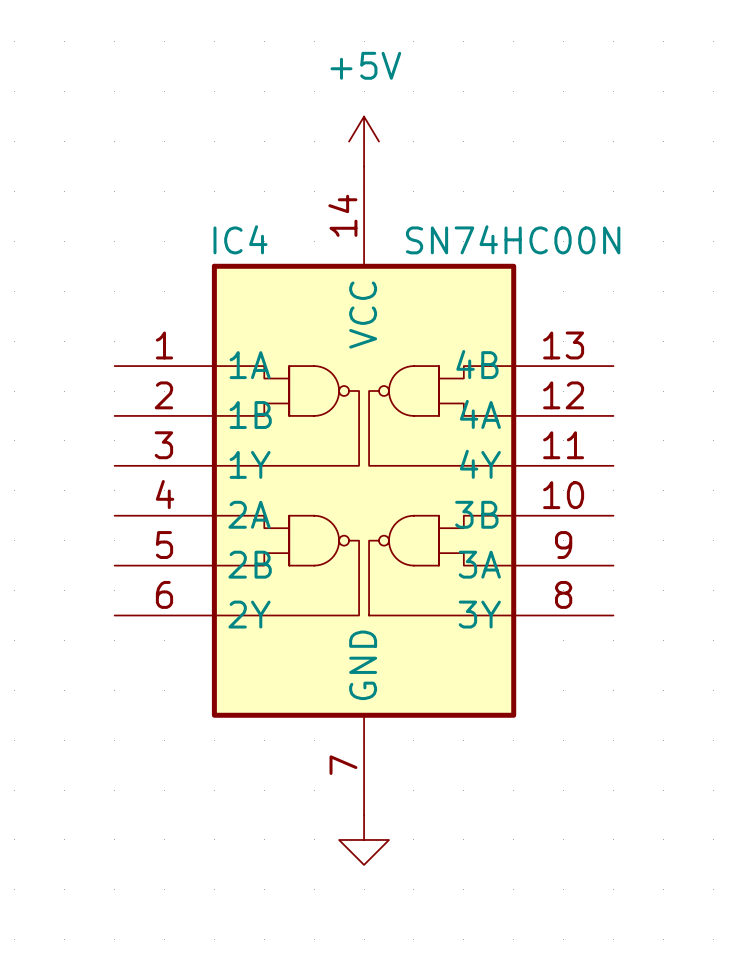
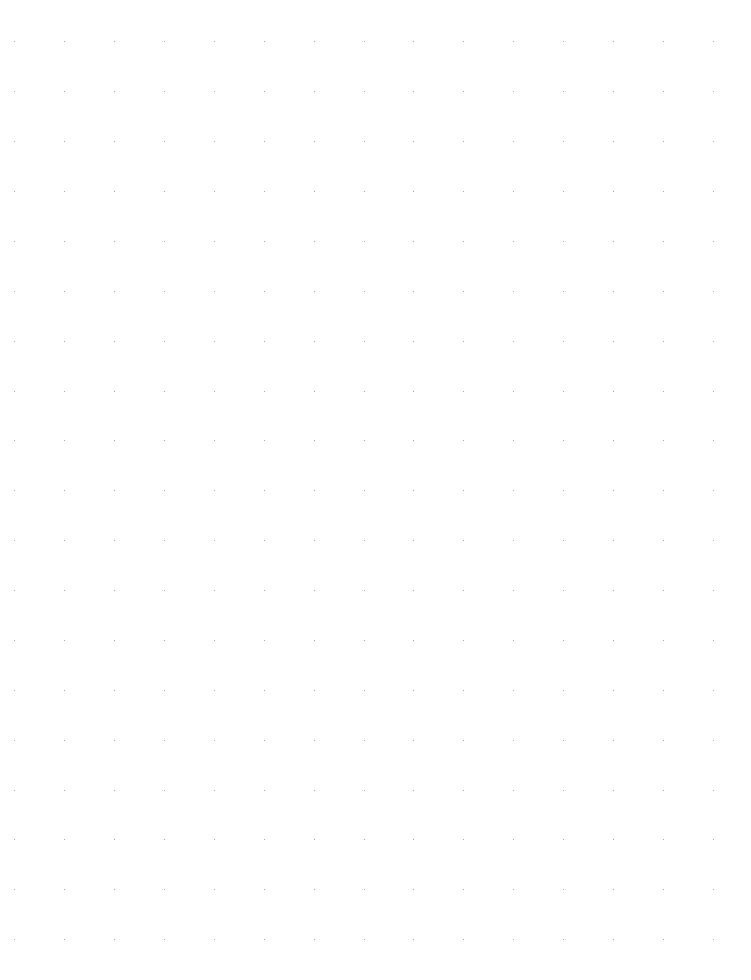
power symbol: +5V (364, 141) -> none
IC4: SN74HC00N (364, 490) -> none
power symbol: (364, 839) -> none

